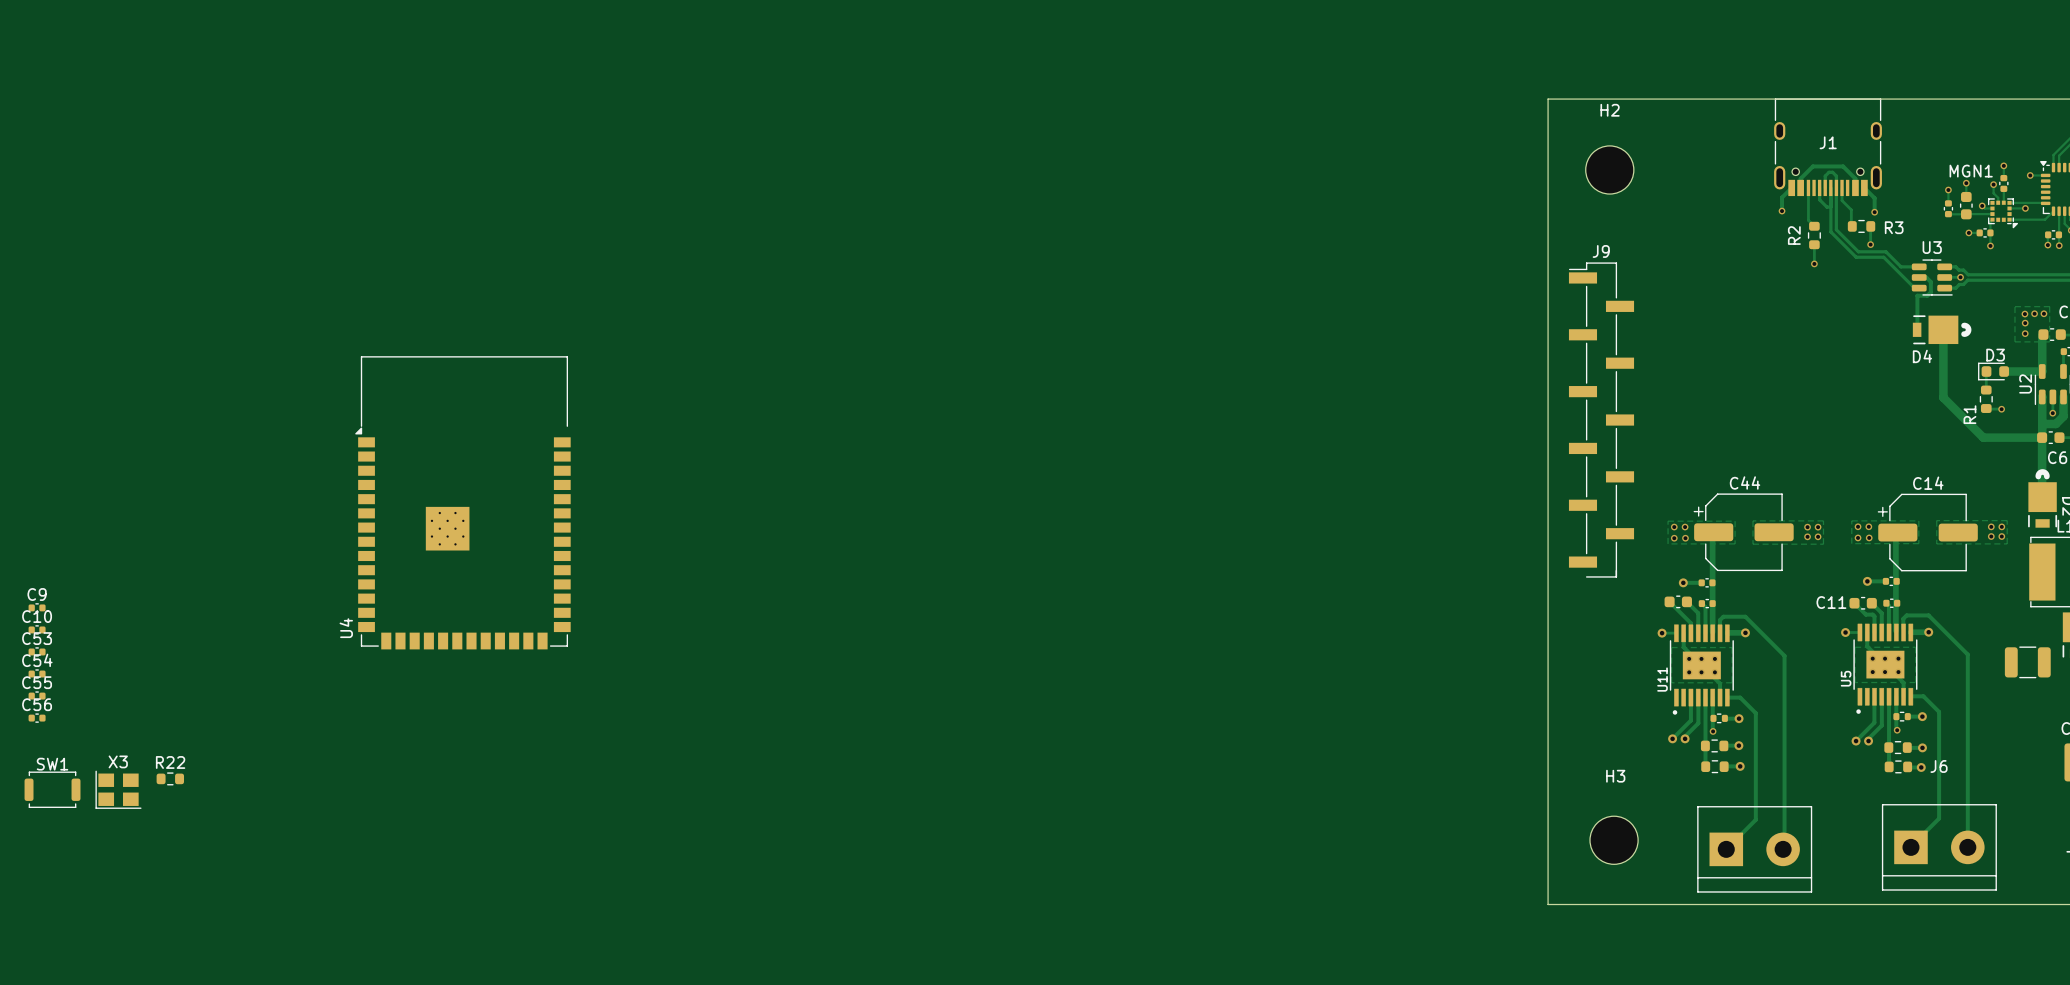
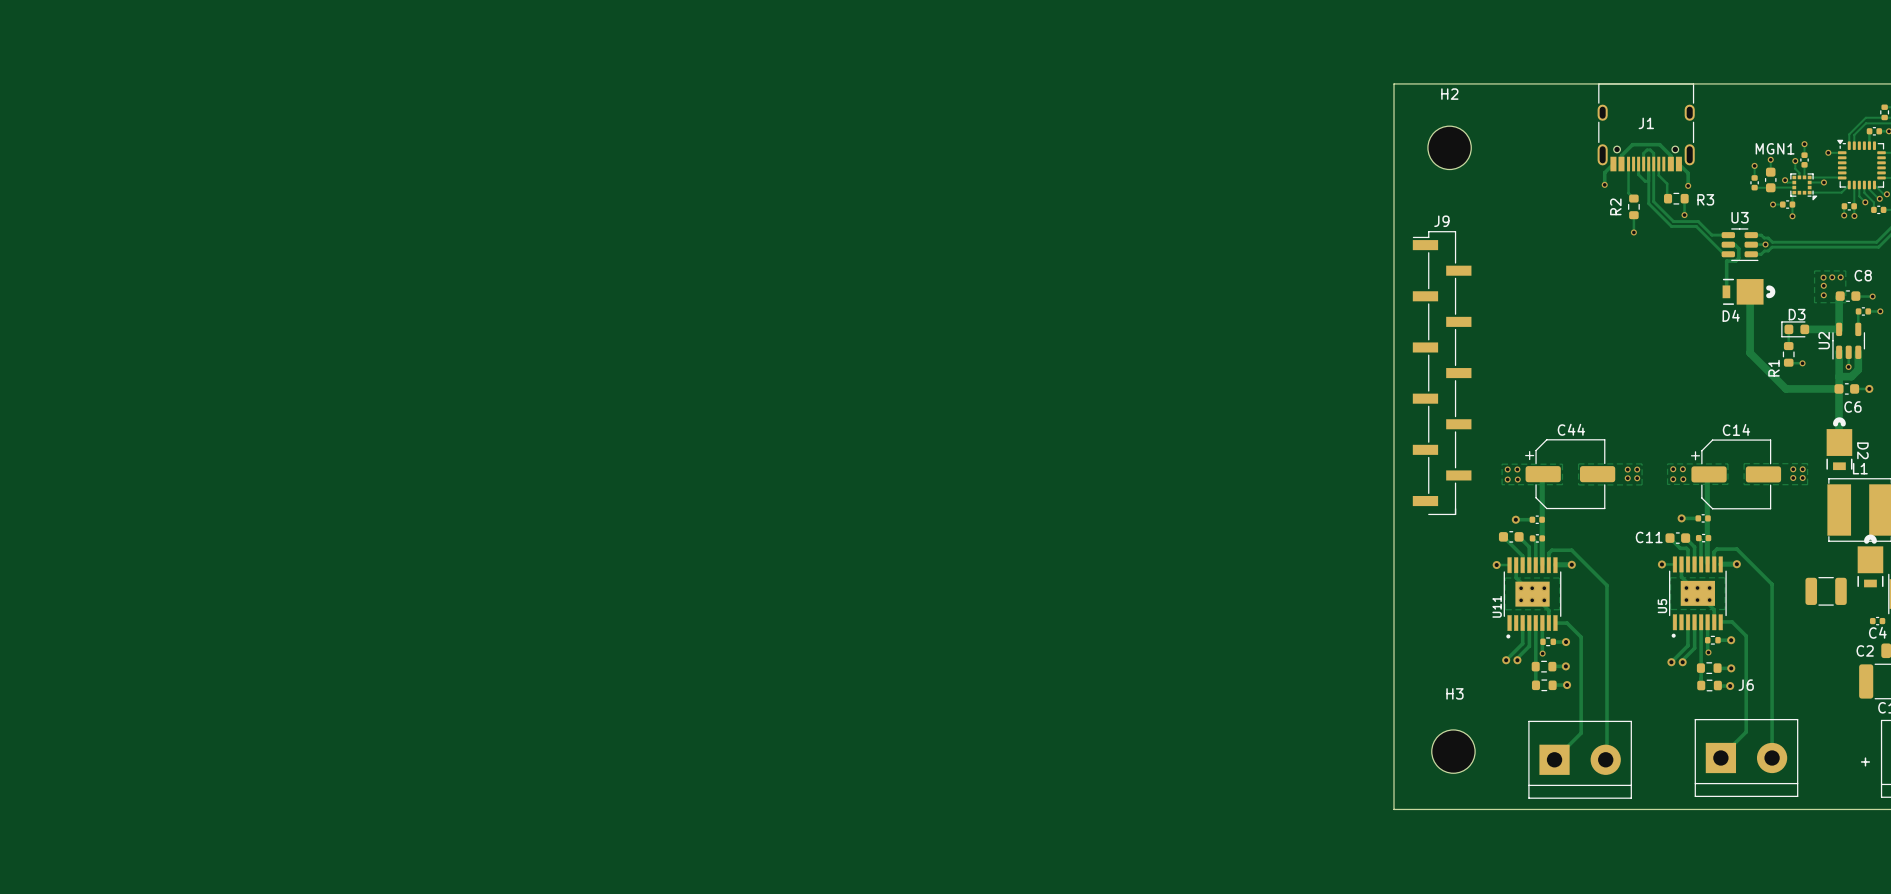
U4: (462, 502) -> none
C9: (37, 607) -> none
C10: (37, 629) -> none
C53: (37, 651) -> none
C54: (37, 674) -> none
C55: (37, 696) -> none
C56: (37, 718) -> none
R22: (170, 778) -> none
SW1: (52, 789) -> none
X3: (118, 789) -> none

